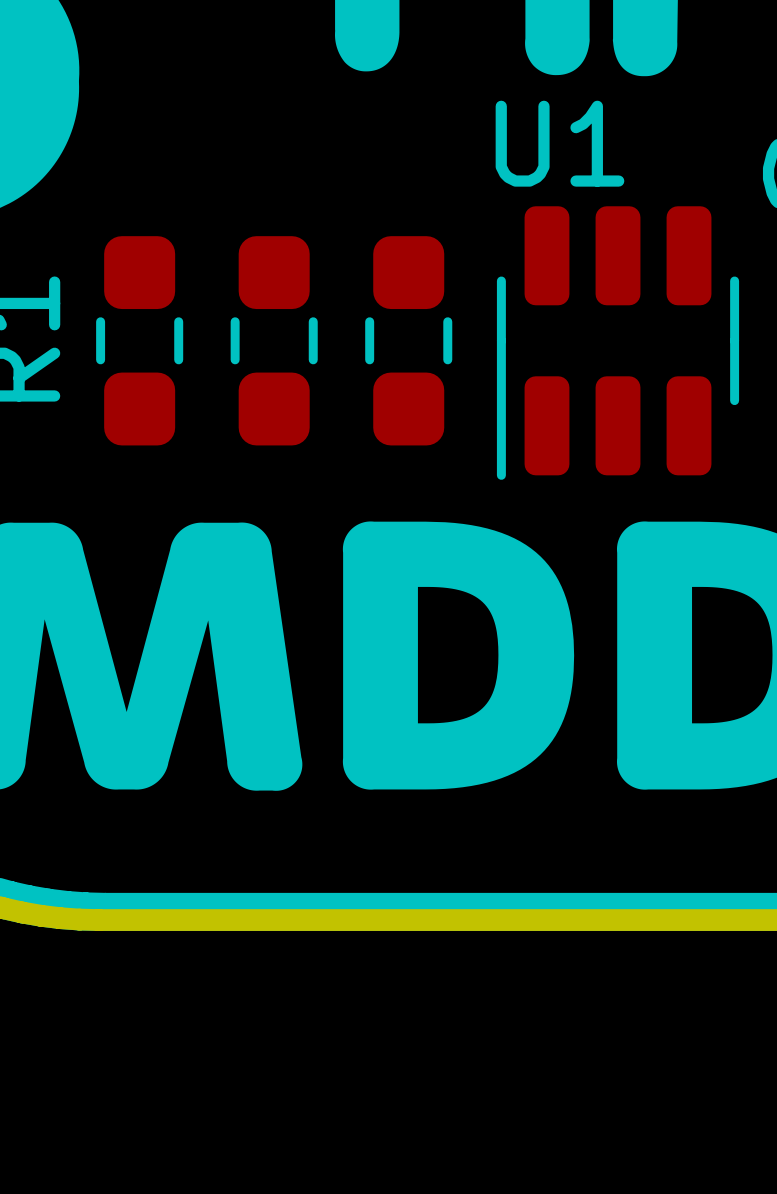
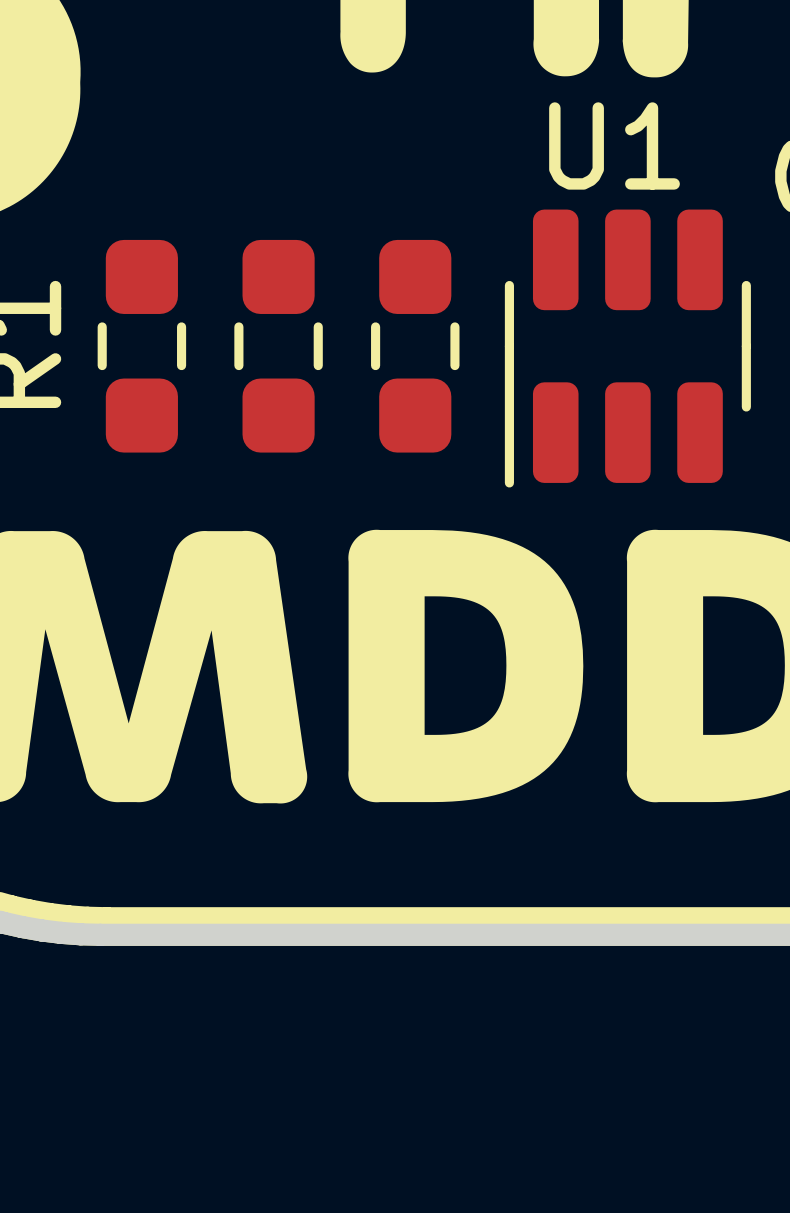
U1 name position: U1 (559, 143) -> U1 (614, 145)

